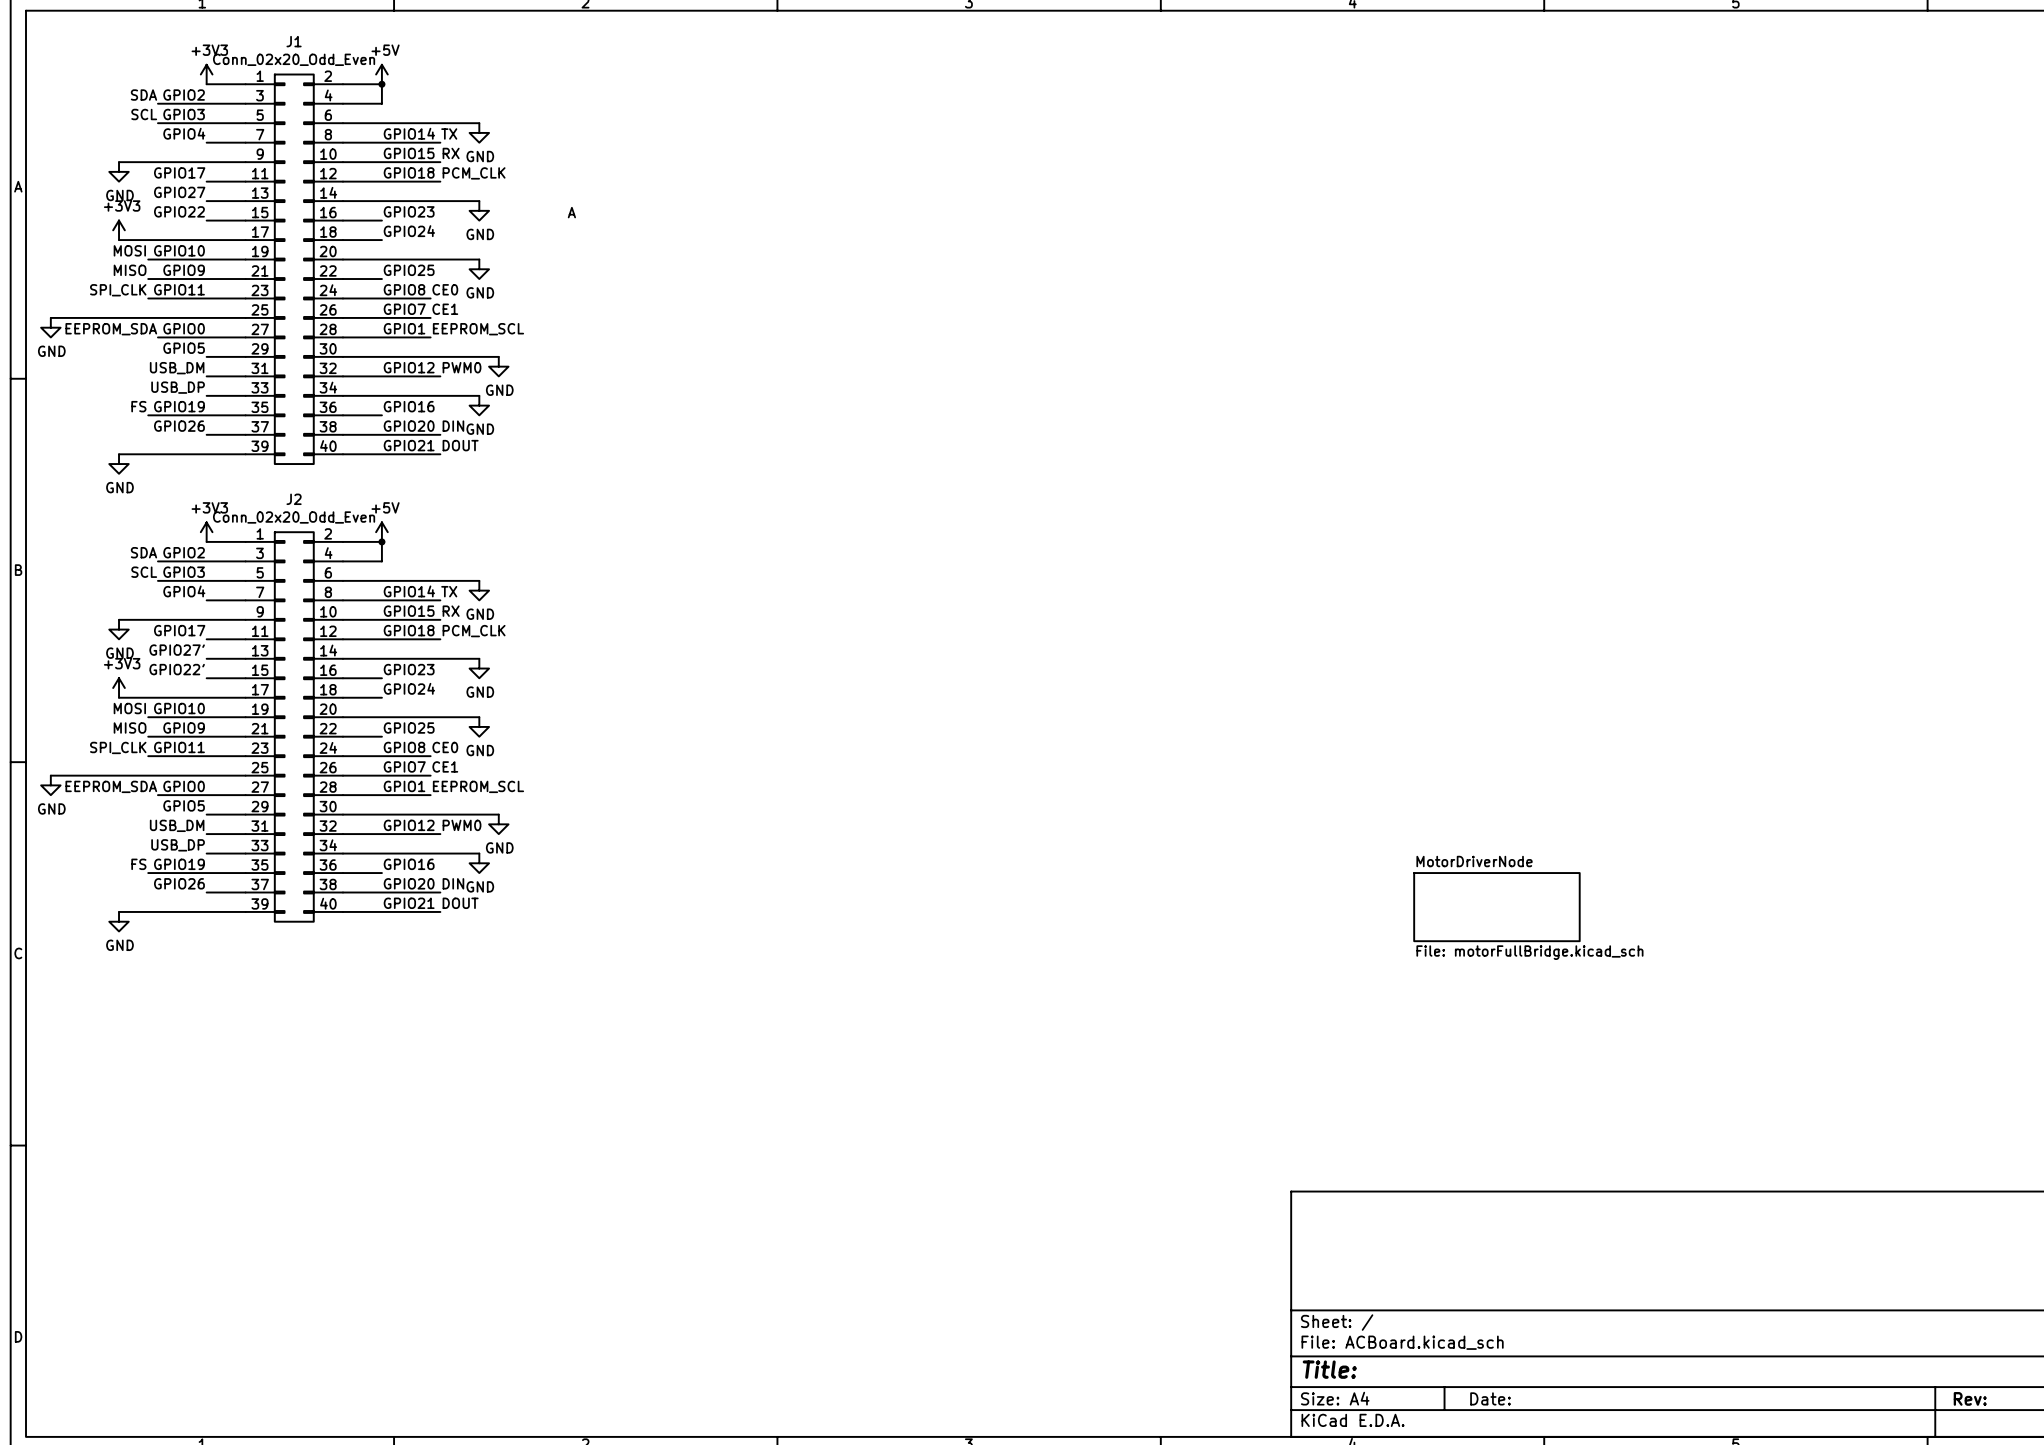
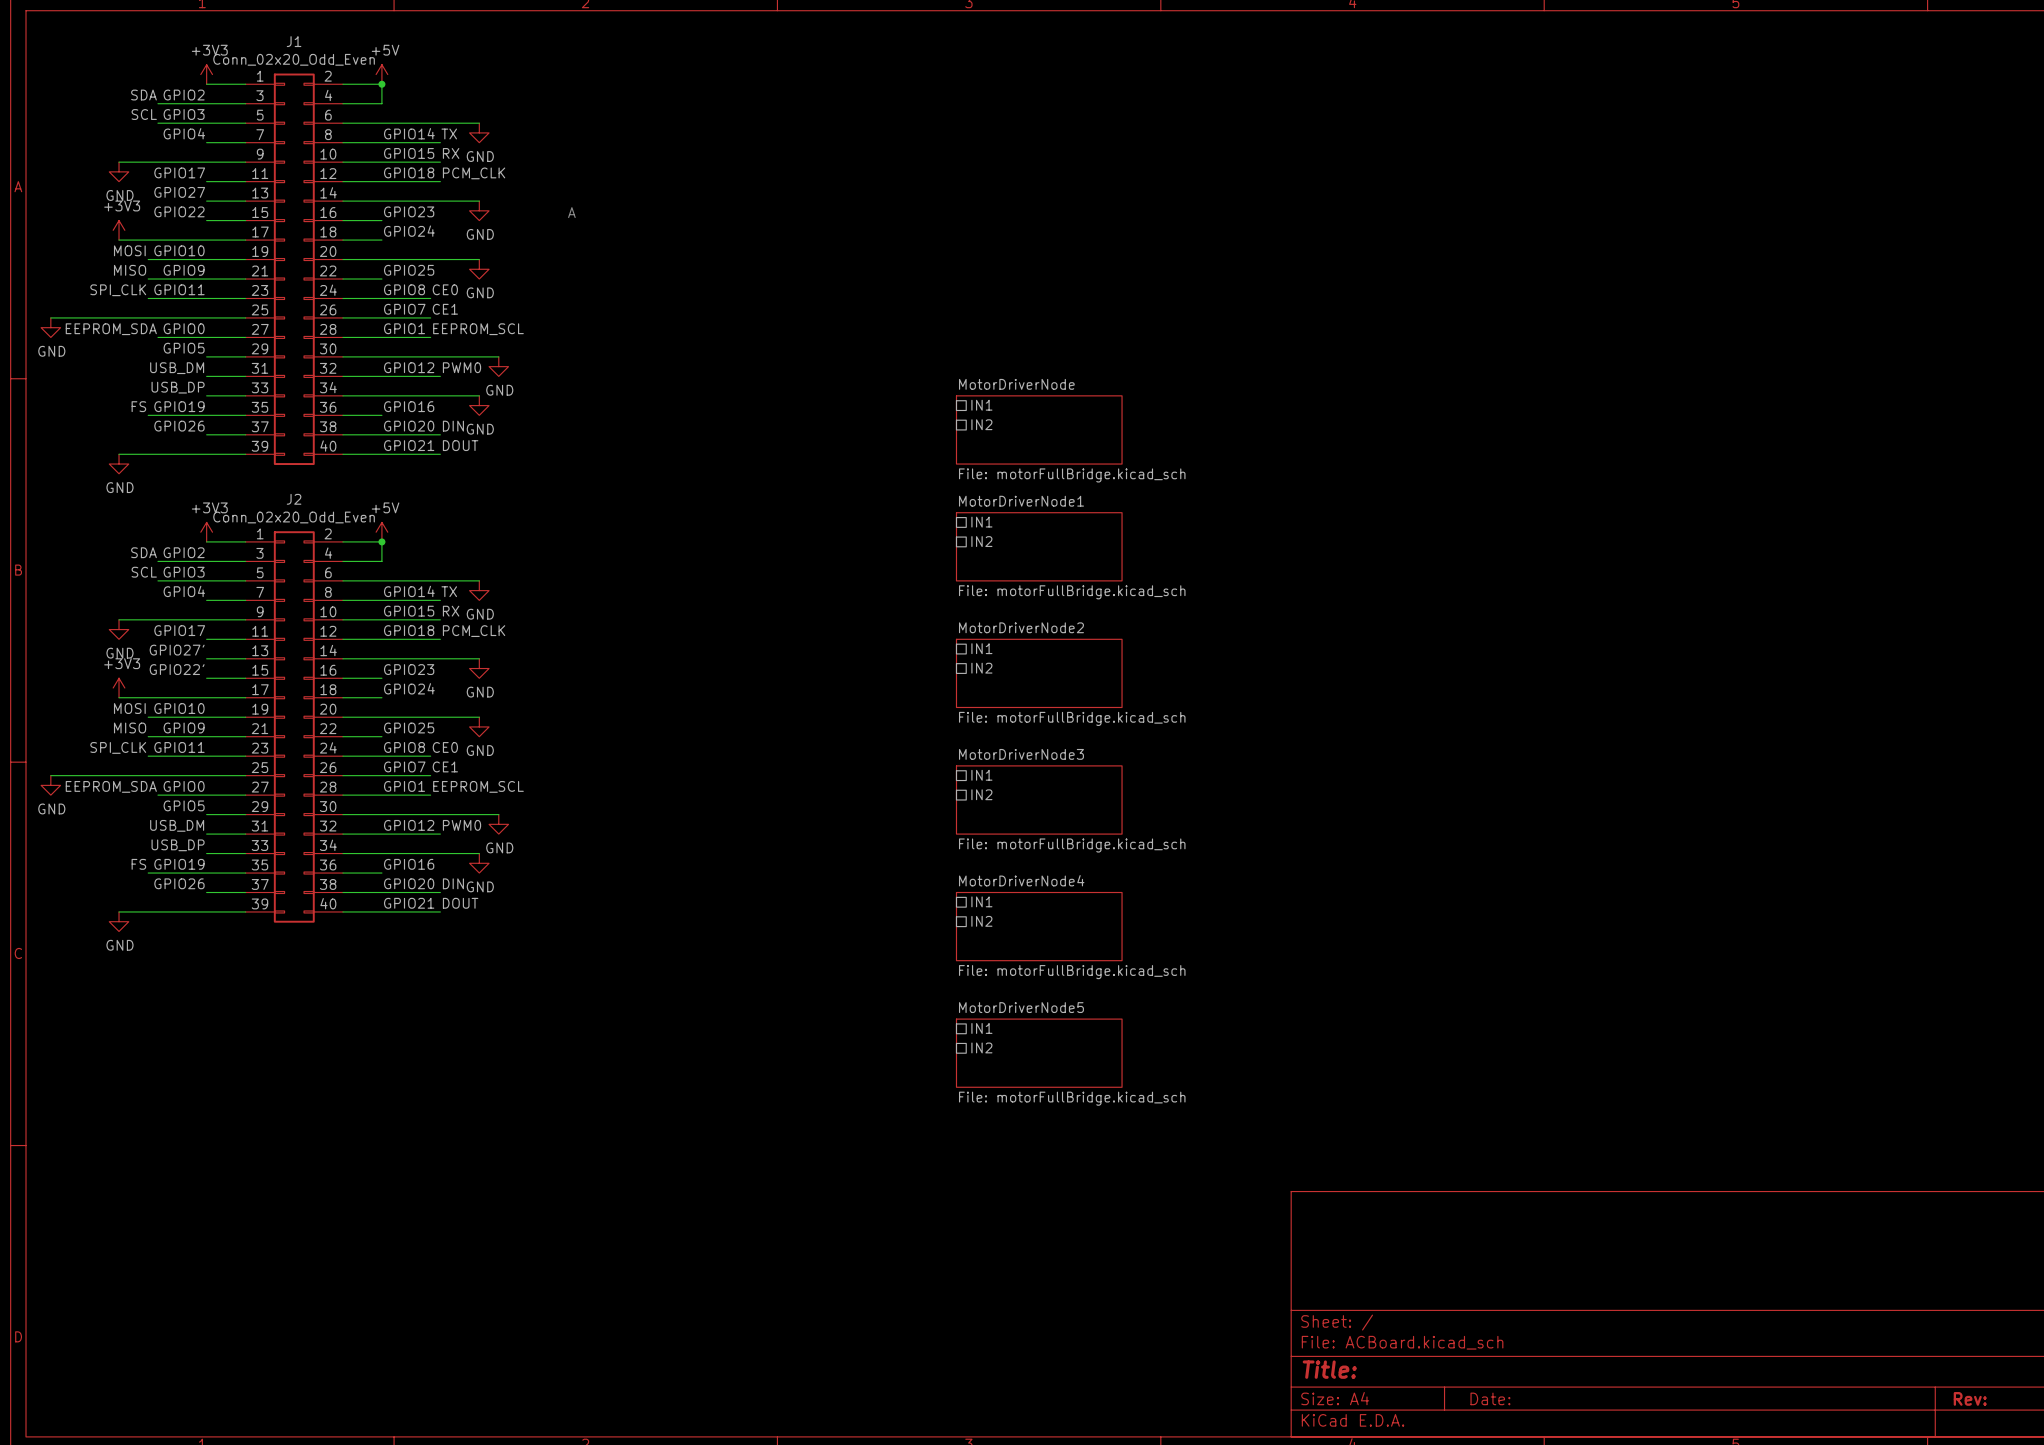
sheet pin: none -> IN1 (981, 405)
sheet pin: none -> IN2 (981, 424)
sheet MotorDriverNode: none -> File: motorFullBridge.kicad_sch (1039, 429)
sheet pin: none -> IN1 (981, 522)
sheet pin: none -> IN2 (981, 541)
sheet MotorDriverNode1: none -> File: motorFullBridge.kicad_sch (1039, 546)
sheet pin: none -> IN1 (981, 648)
sheet pin: none -> IN2 (981, 668)
sheet MotorDriverNode2: none -> File: motorFullBridge.kicad_sch (1039, 673)
sheet pin: none -> IN1 (981, 775)
sheet pin: none -> IN2 (981, 794)
sheet MotorDriverNode3: none -> File: motorFullBridge.kicad_sch (1039, 799)
sheet pin: none -> IN1 (981, 901)
sheet MotorDriverNode: File: motorFullBridge.kicad_sch (1496, 907) -> none
sheet pin: none -> IN2 (981, 921)
sheet MotorDriverNode4: none -> File: motorFullBridge.kicad_sch (1039, 926)
sheet pin: none -> IN1 (981, 1028)
sheet pin: none -> IN2 (981, 1047)
sheet MotorDriverNode5: none -> File: motorFullBridge.kicad_sch (1039, 1053)

